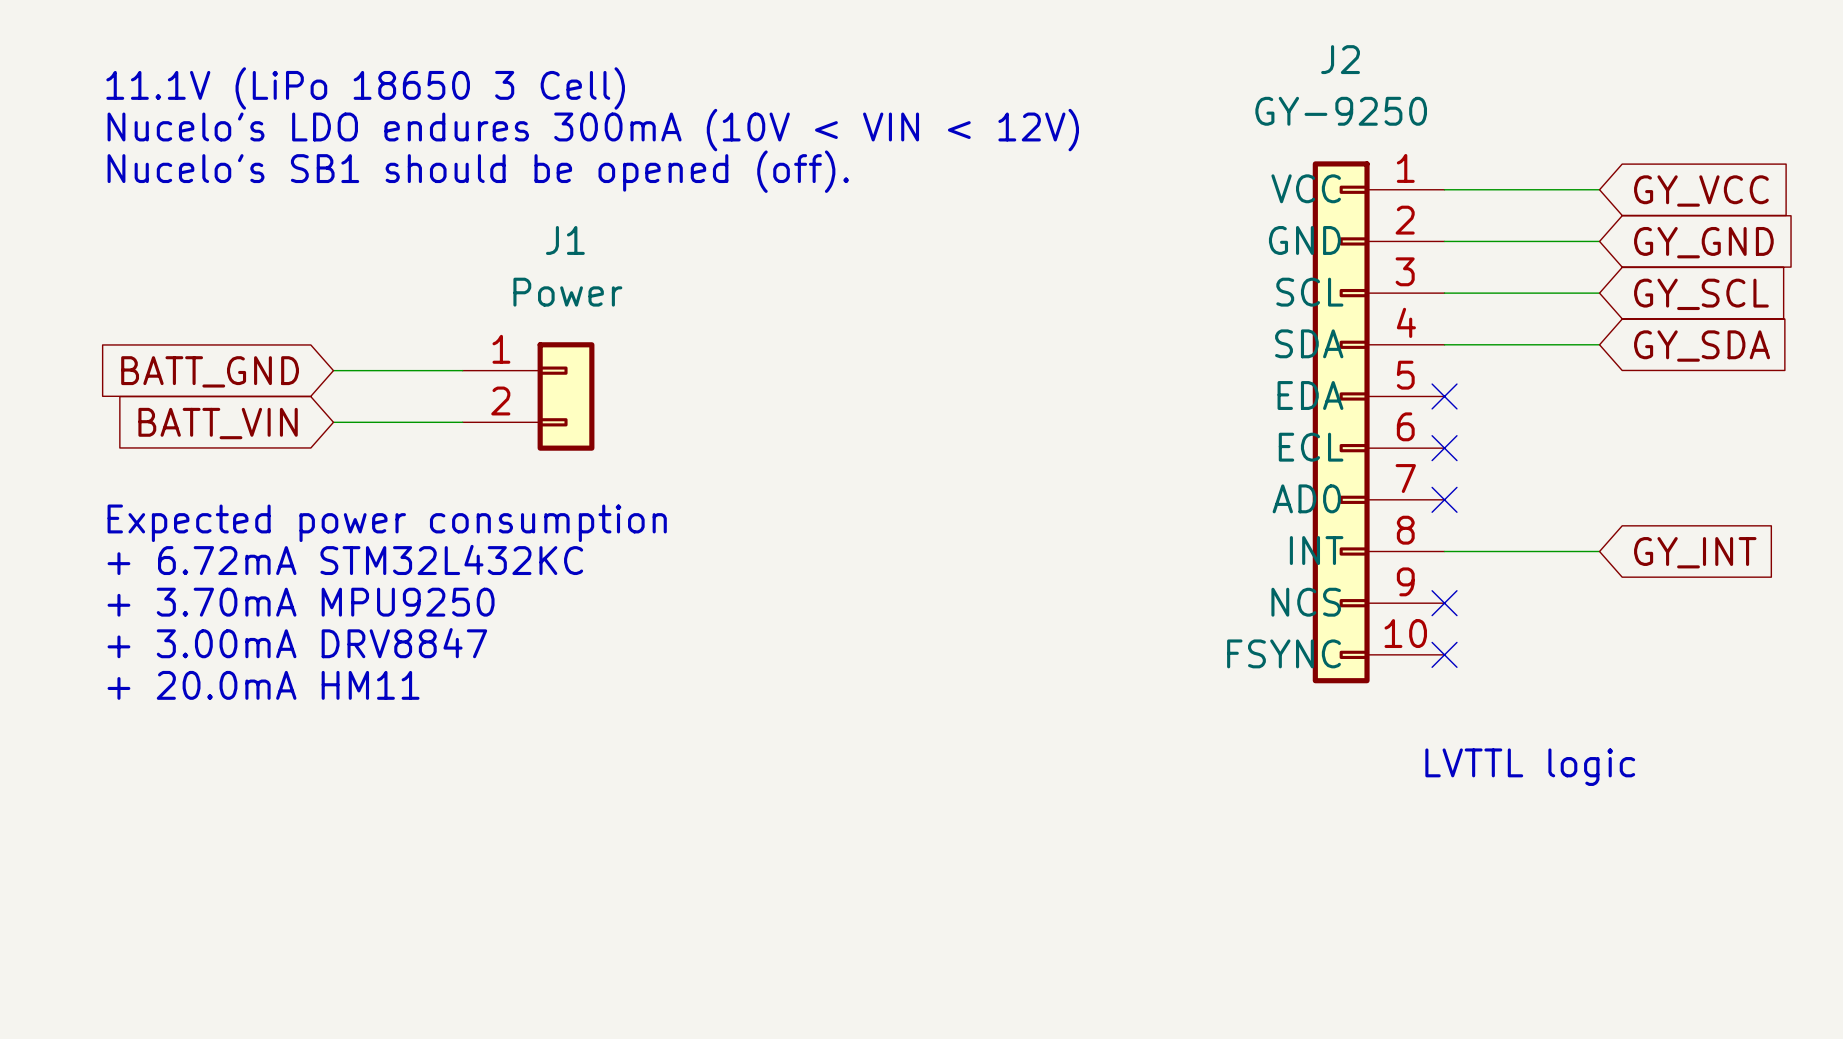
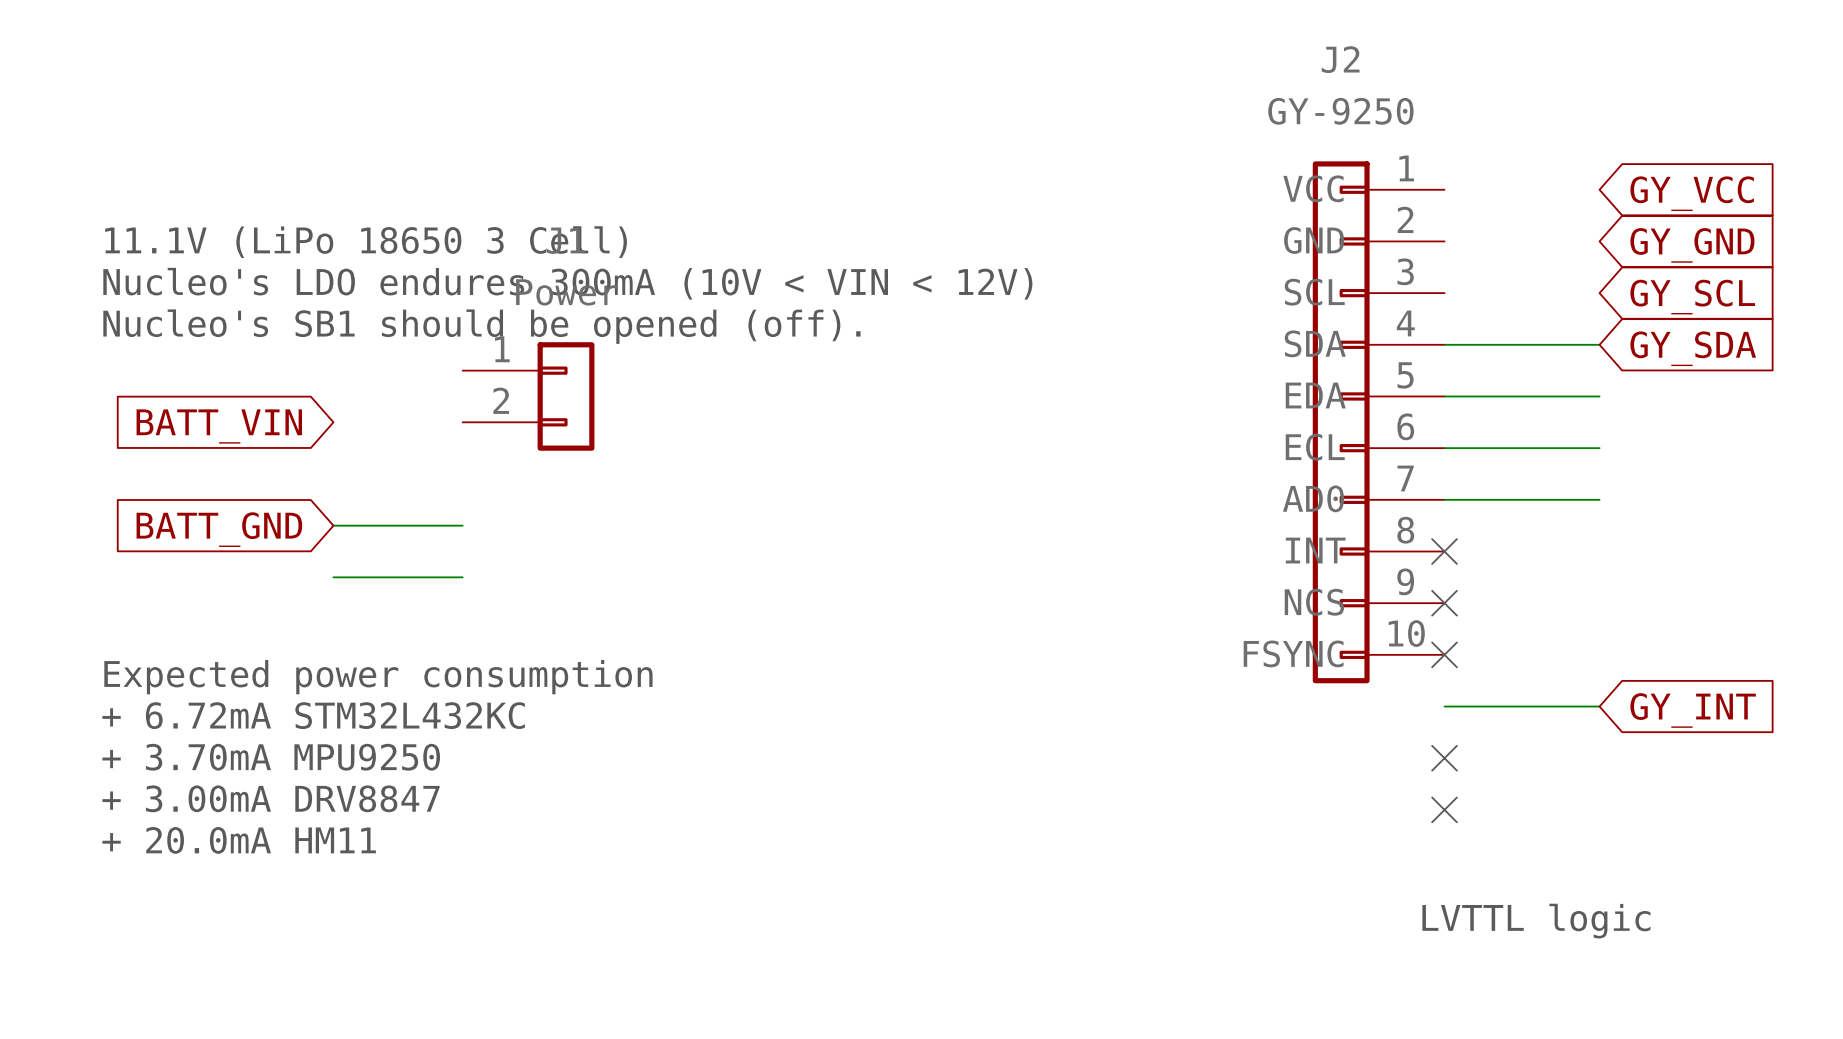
text position: 11.1V (LiPo 18650 3 Cell) (365, 88) -> 11.1V (LiPo 18650 3 Cell) (366, 242)
text: Nucelo's LDO endures 300mA (10V < VIN < 12V) (593, 130) -> none
text: Nucelo's SB1 should be opened (off). (478, 171) -> none
wire: (1444, 189) (1599, 189) -> (1444, 499) (1599, 499)
wire: (1444, 241) (1599, 241) -> (1444, 396) (1599, 396)
text: none -> Nucleo's LDO endures 300mA (10V < VIN < 12V) (567, 283)
wire: (1444, 293) (1599, 293) -> (1444, 448) (1599, 448)
text: none -> Nucleo's SB1 should be opened (off). (481, 326)
wire: (333, 370) (462, 370) -> (333, 525) (462, 525)
global label position: BATT_GND (210, 371) -> BATT_GND (219, 529)
no-connect mark: (1444, 396) -> none
wire: (333, 422) (462, 422) -> (333, 577) (462, 577)
no-connect mark: (1444, 448) -> none
no-connect mark: (1444, 499) -> none
text position: Expected power consumption (387, 523) -> Expected power consumption (378, 677)
wire: (1444, 551) (1599, 551) -> (1444, 706) (1599, 706)
no-connect mark: none -> (1444, 551)
global label position: GY_INT (1695, 552) -> GY_INT (1693, 710)
text position: + 6.72mA STM32L432KC (345, 559) -> + 6.72mA STM32L432KC (313, 715)
text position: + 3.70mA MPU9250 (301, 602) -> + 3.70mA MPU9250 (271, 757)
text position: + 3.00mA DRV8847 (297, 643) -> + 3.00mA DRV8847 (271, 798)
text position: + 20.0mA HM11 (263, 685) -> + 20.0mA HM11 (239, 840)
no-connect mark: none -> (1444, 758)
text position: LVTTL logic (1530, 767) -> LVTTL logic (1536, 921)
no-connect mark: none -> (1444, 809)

